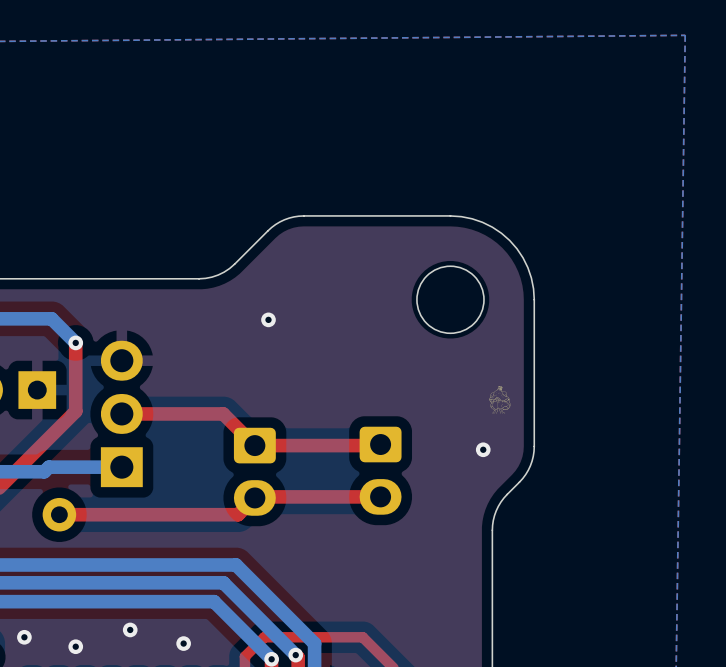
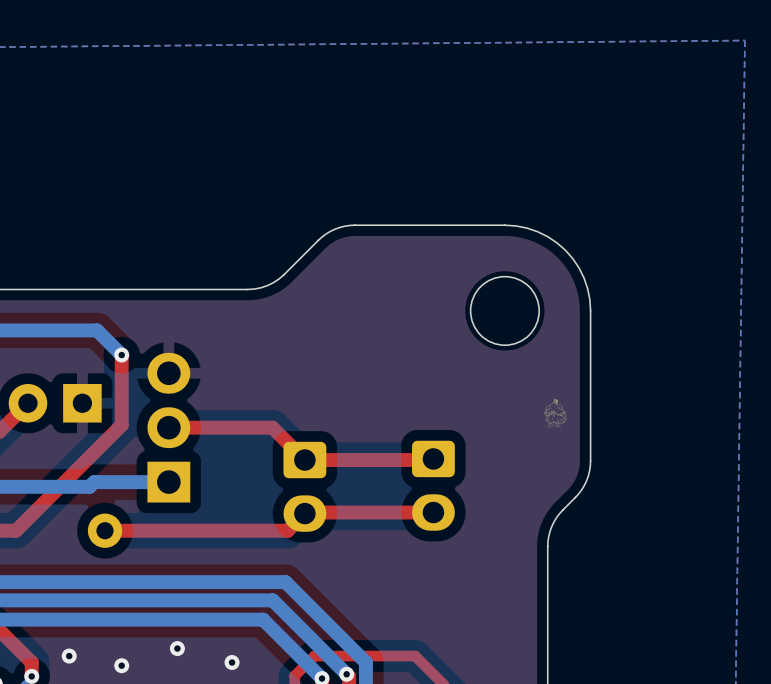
via: (268, 319) -> none
via: (483, 449) -> none

